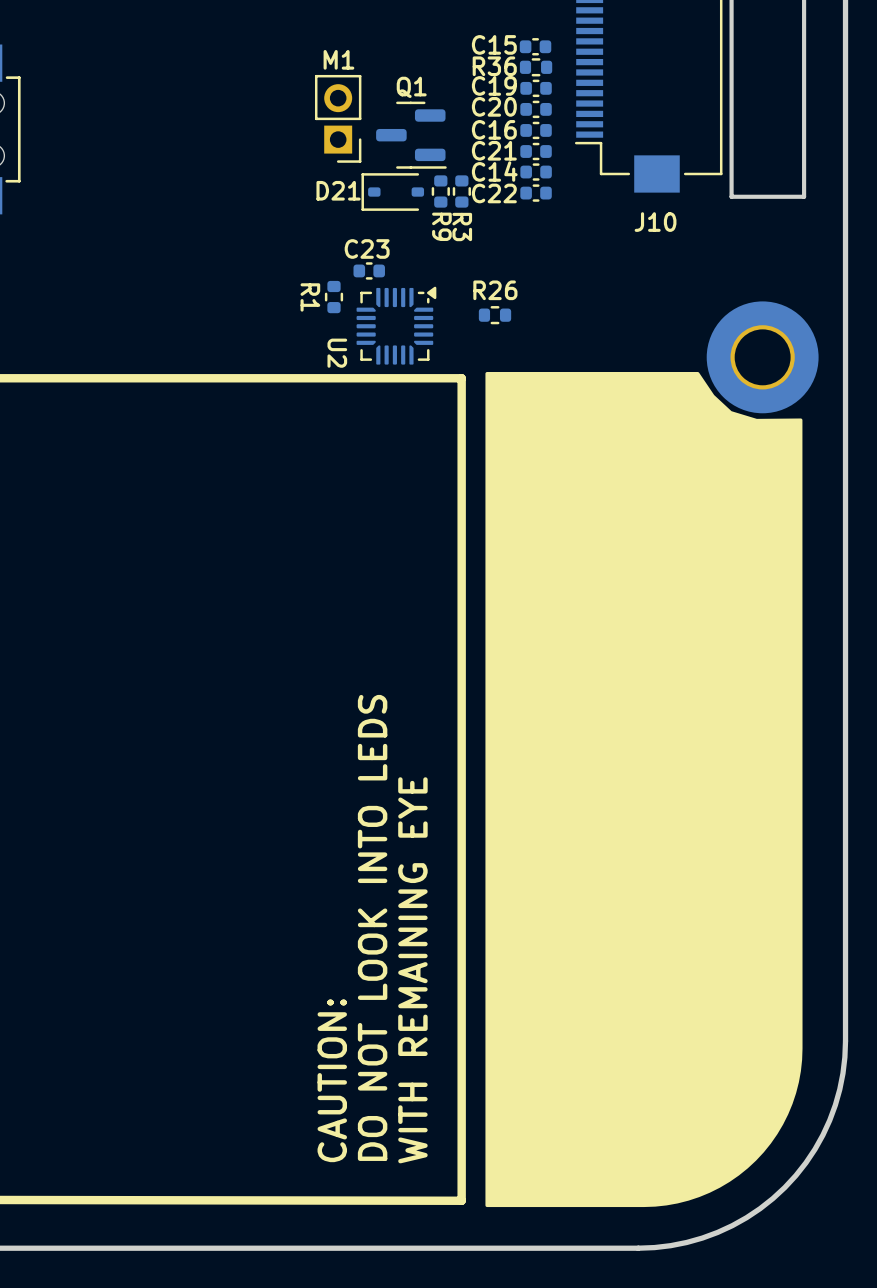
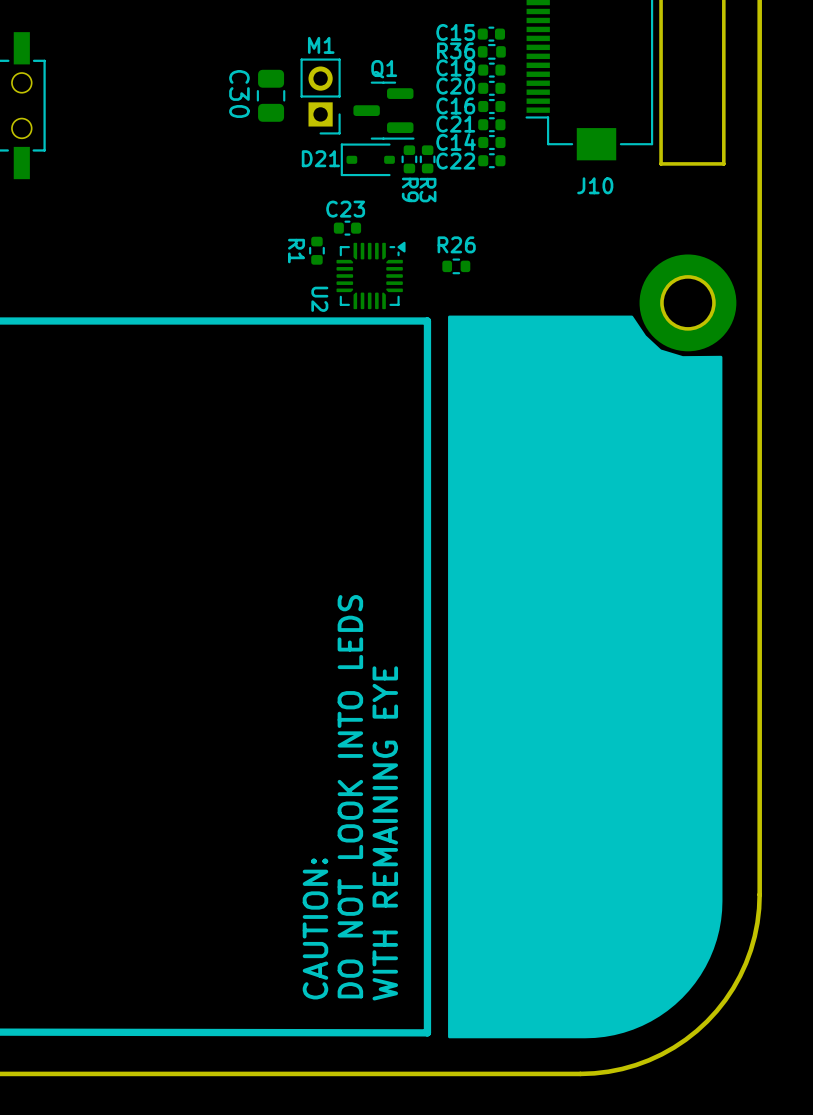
C30: none -> (271, 95)

